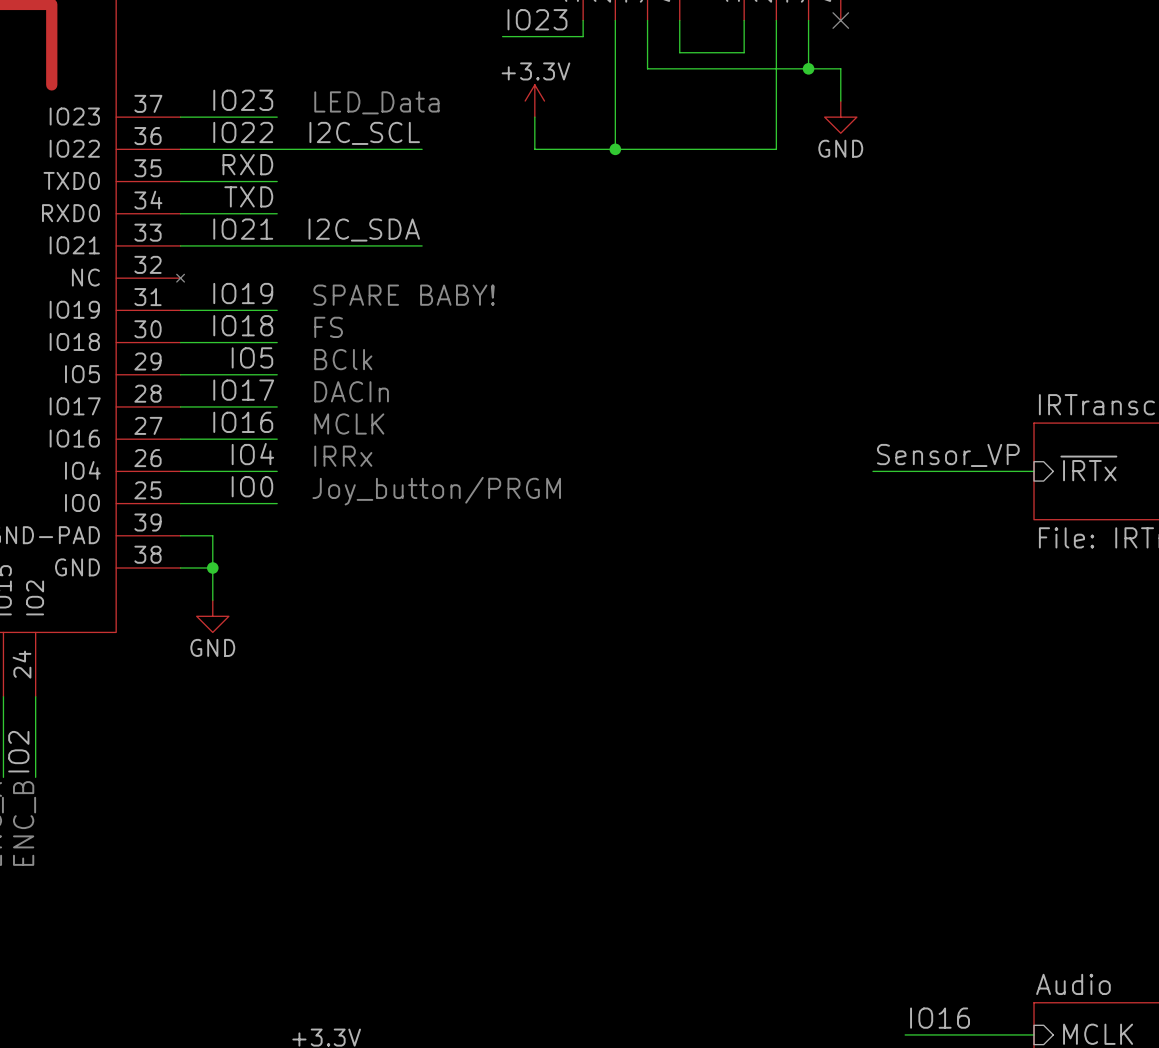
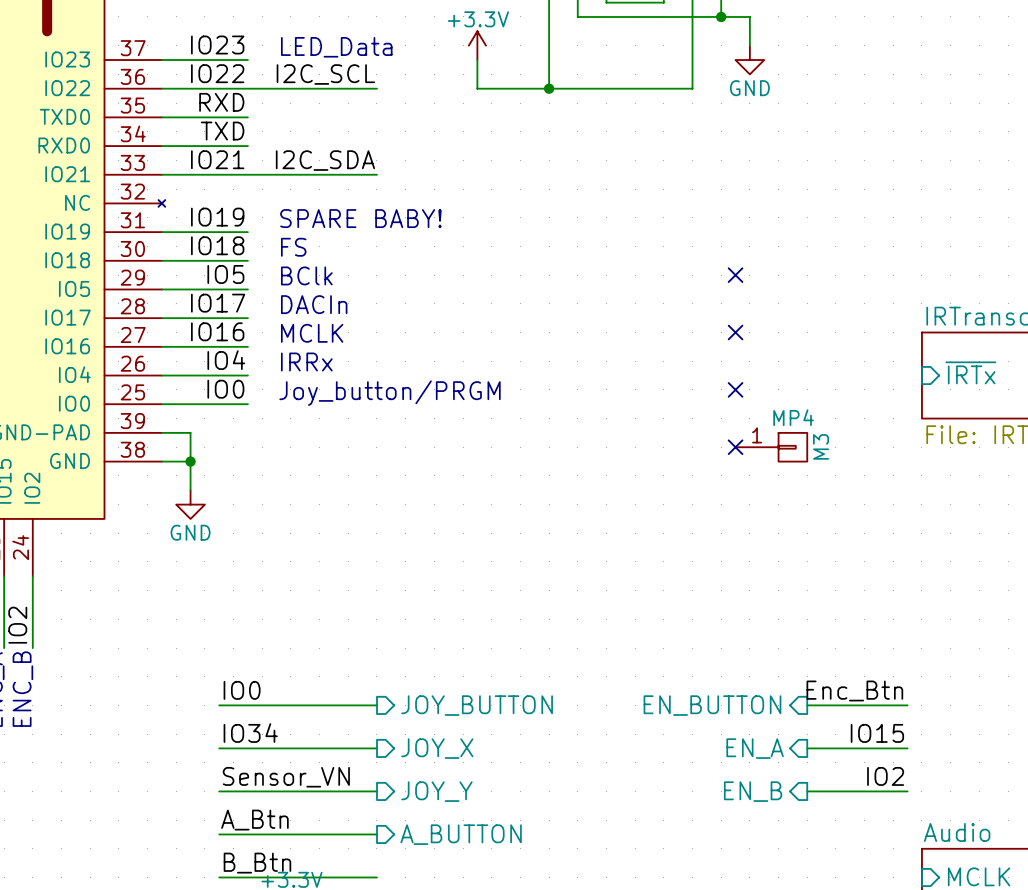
no-connect mark: none -> (735, 275)
no-connect mark: none -> (735, 332)
label: Sensor_VP (948, 455) -> none
wire: (872, 471) (1034, 471) -> none
no-connect mark: none -> (735, 389)
no-connect mark: none -> (735, 447)
MP4: none -> M3 (771, 447)
label: none -> IO0 (242, 690)
label: none -> Enc_Btn (854, 690)
wire: none -> (219, 705) (376, 705)
sheet pin: none -> JOY_BUTTON (477, 705)
sheet pin: none -> EN_BUTTON (712, 705)
wire: none -> (807, 705) (907, 705)
label: none -> IO34 (250, 732)
label: none -> IO15 (877, 733)
wire: none -> (219, 748) (376, 748)
sheet pin: none -> JOY_X (437, 748)
sheet pin: none -> EN_A (755, 748)
wire: none -> (807, 748) (907, 748)
label: none -> IO2 (885, 776)
label: none -> Sensor_VN (286, 777)
wire: none -> (219, 791) (376, 791)
sheet pin: none -> JOY_Y (436, 791)
sheet pin: none -> EN_B (753, 791)
wire: none -> (807, 791) (907, 791)
label: none -> A_Btn (254, 820)
wire: none -> (219, 834) (376, 834)
sheet pin: none -> A_BUTTON (461, 834)
label: none -> B_Btn (257, 863)
label: IO16 (940, 1018) -> none
wire: none -> (219, 877) (376, 877)
wire: (905, 1034) (1034, 1034) -> none

